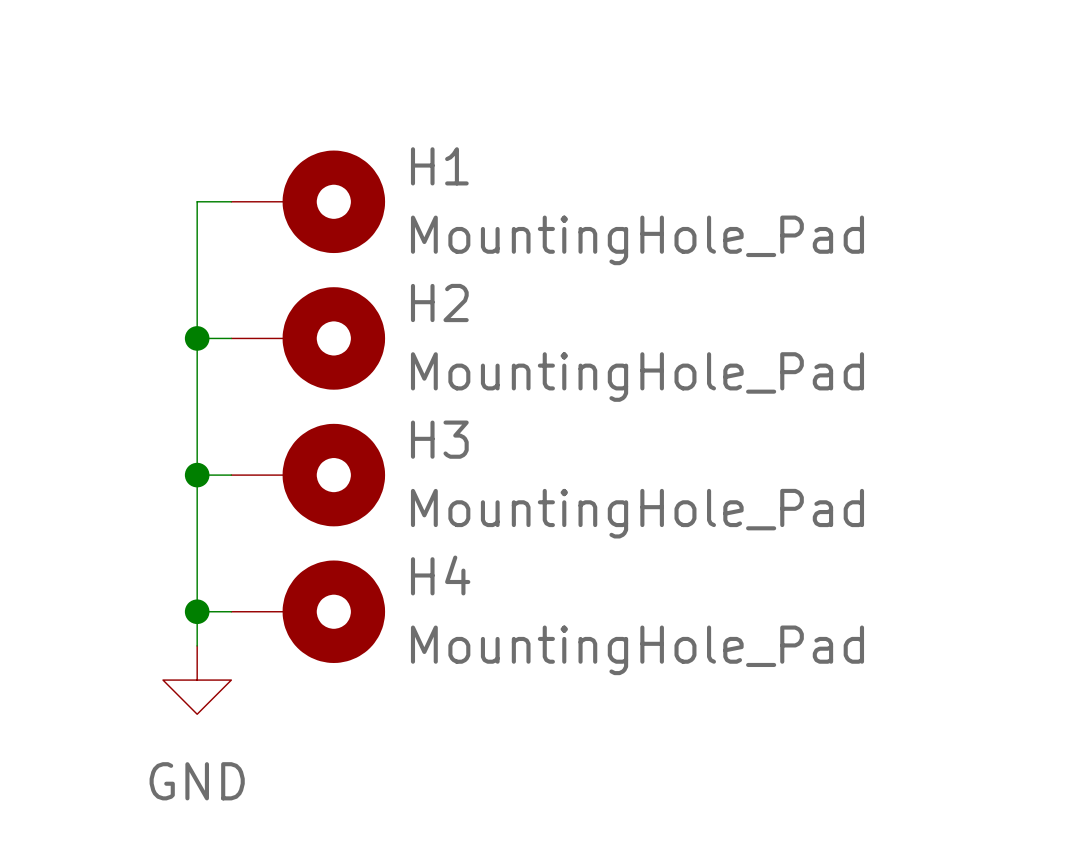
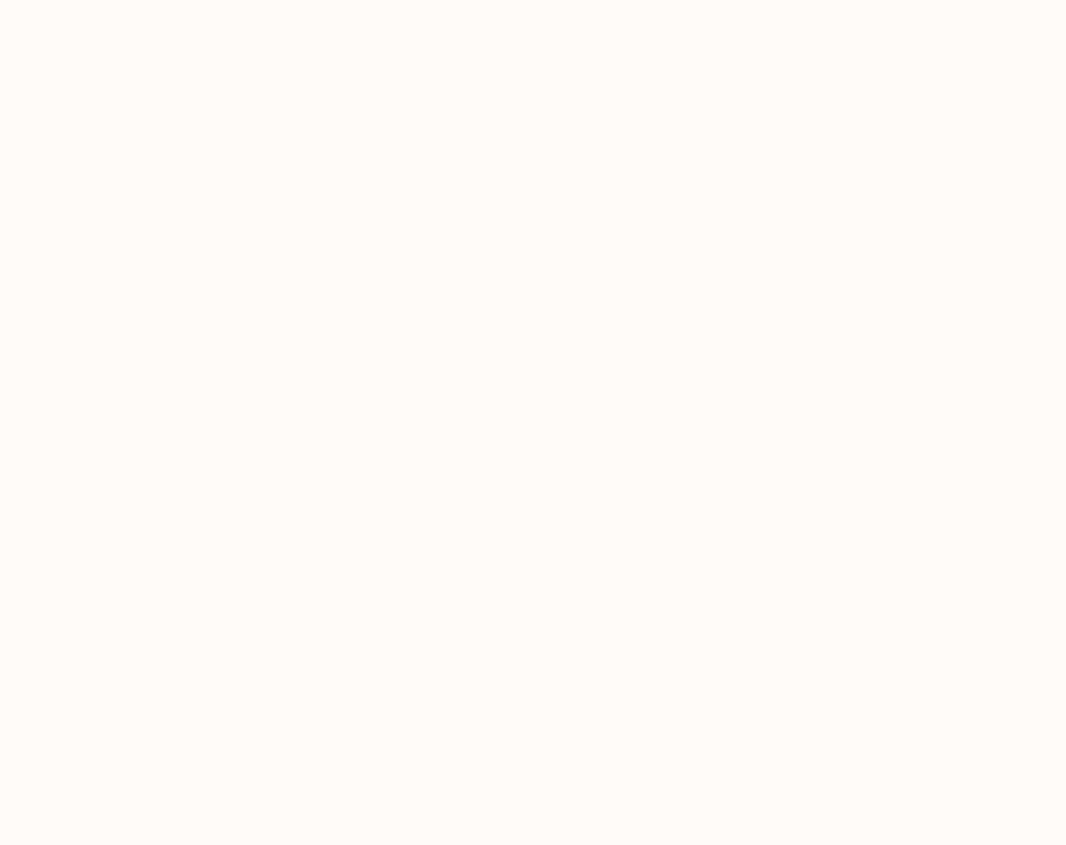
wire: (231, 201) (197, 201) (197, 645) -> none
H1: MountingHole_Pad (308, 201) -> none
wire: (197, 338) (231, 338) -> none
junction: (197, 338) -> none
H2: MountingHole_Pad (308, 338) -> none
wire: (197, 475) (231, 475) -> none
junction: (197, 475) -> none
H3: MountingHole_Pad (308, 475) -> none
wire: (197, 611) (231, 611) -> none
junction: (197, 611) -> none
H4: MountingHole_Pad (308, 611) -> none
power symbol: GND (197, 680) -> none

